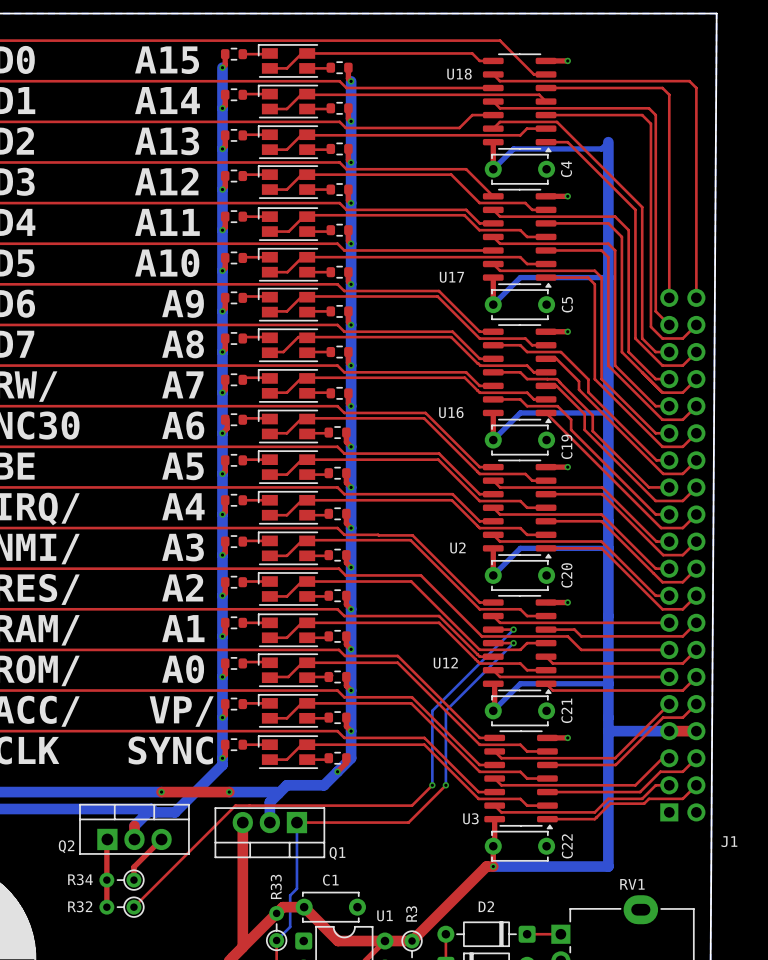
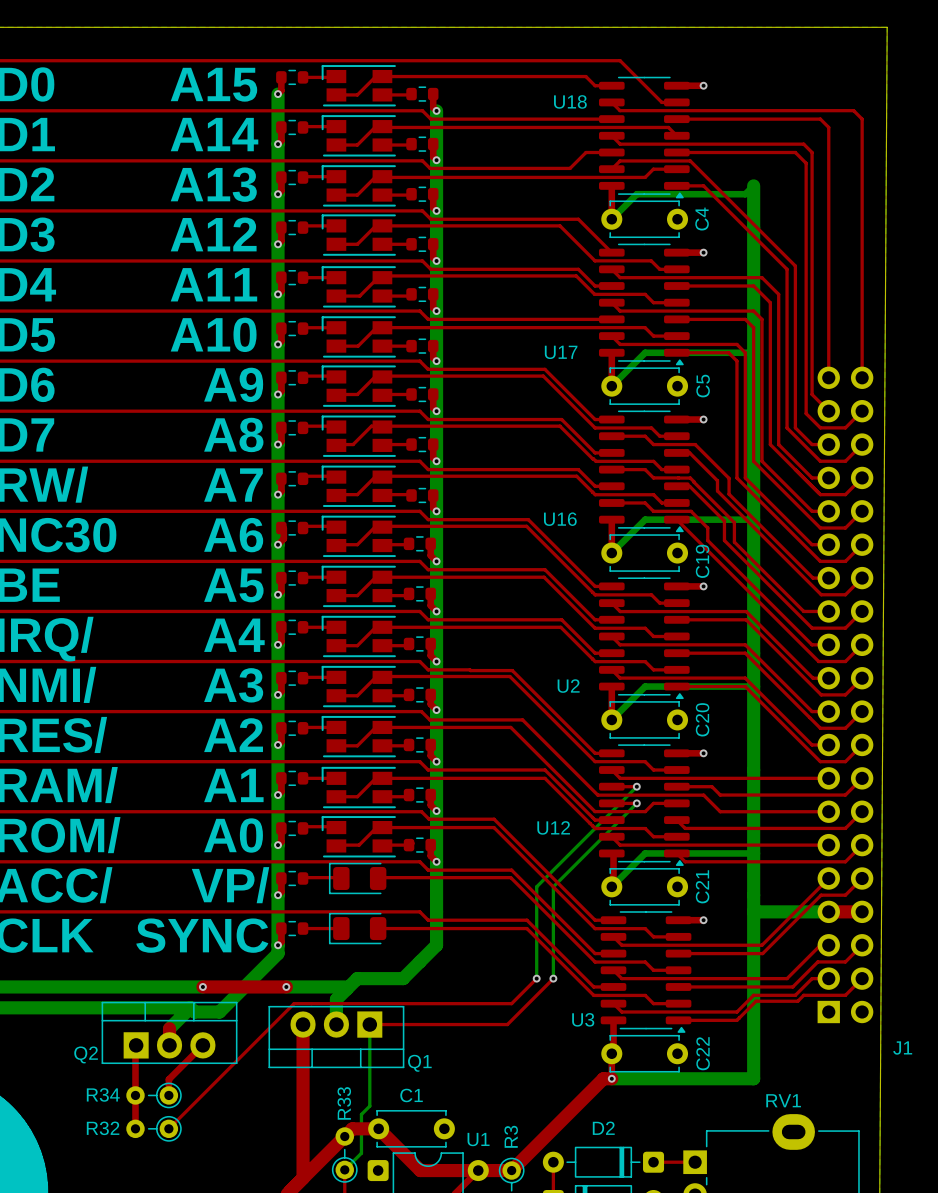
part footprint: [257, 694, 319, 728] -> [328, 862, 387, 895]
top track: (301, 703) (286, 718) (269, 718) -> none
top track: (328, 717) (307, 718) -> none
part: (337, 717) -> none
top track: (346, 717) (346, 726) (351, 731) -> none
via: (351, 731) -> none
part footprint: [257, 735, 319, 769] -> [328, 912, 387, 945]
top track: (301, 744) (286, 759) (269, 759) -> none
top track: (328, 758) (307, 759) -> none
part: (337, 758) -> none
top track: (346, 758) (346, 762) (337, 771) -> none
via: (337, 771) -> none

